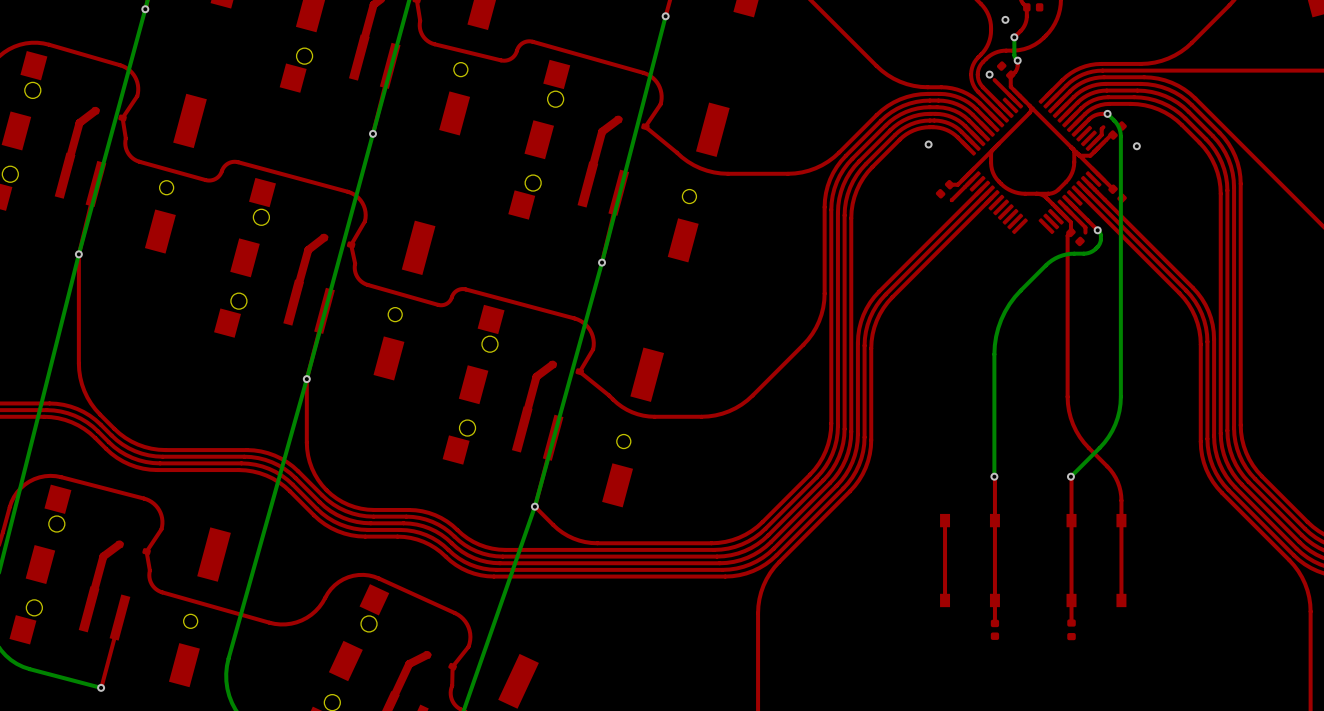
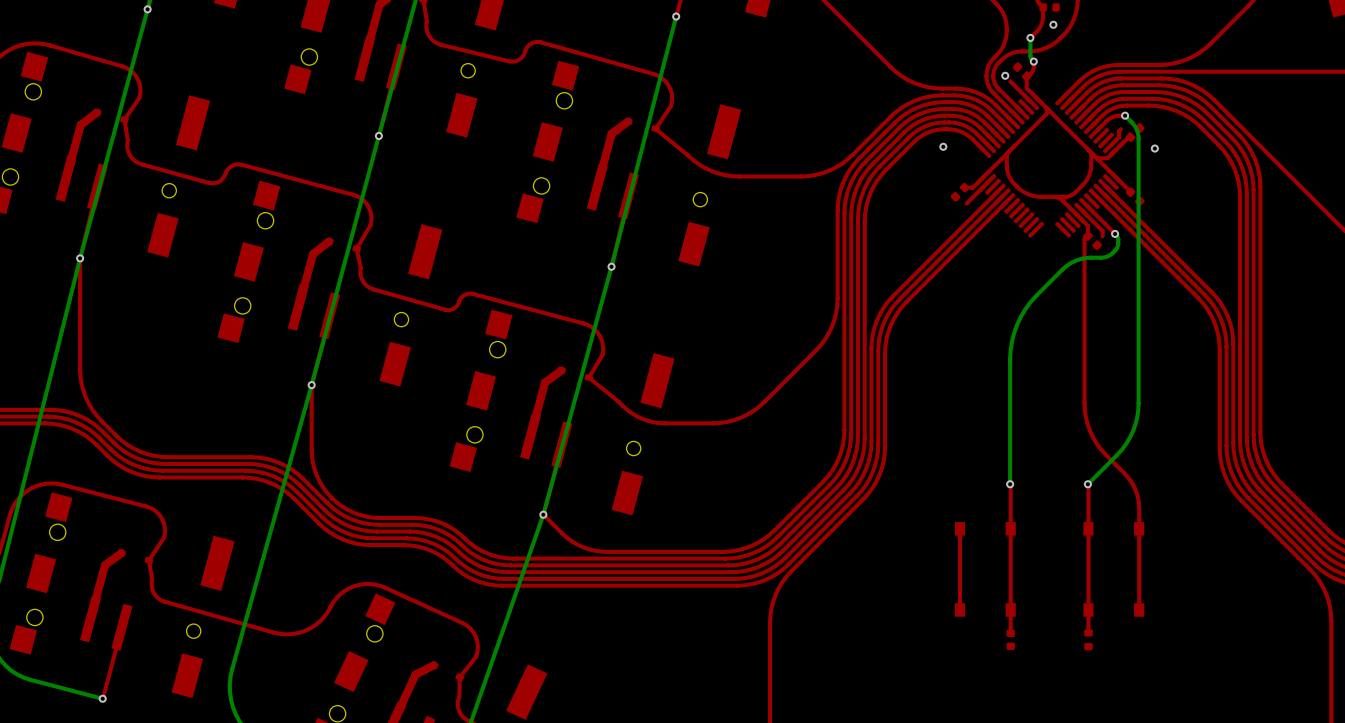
via position: (1005, 19) -> (1053, 24)

